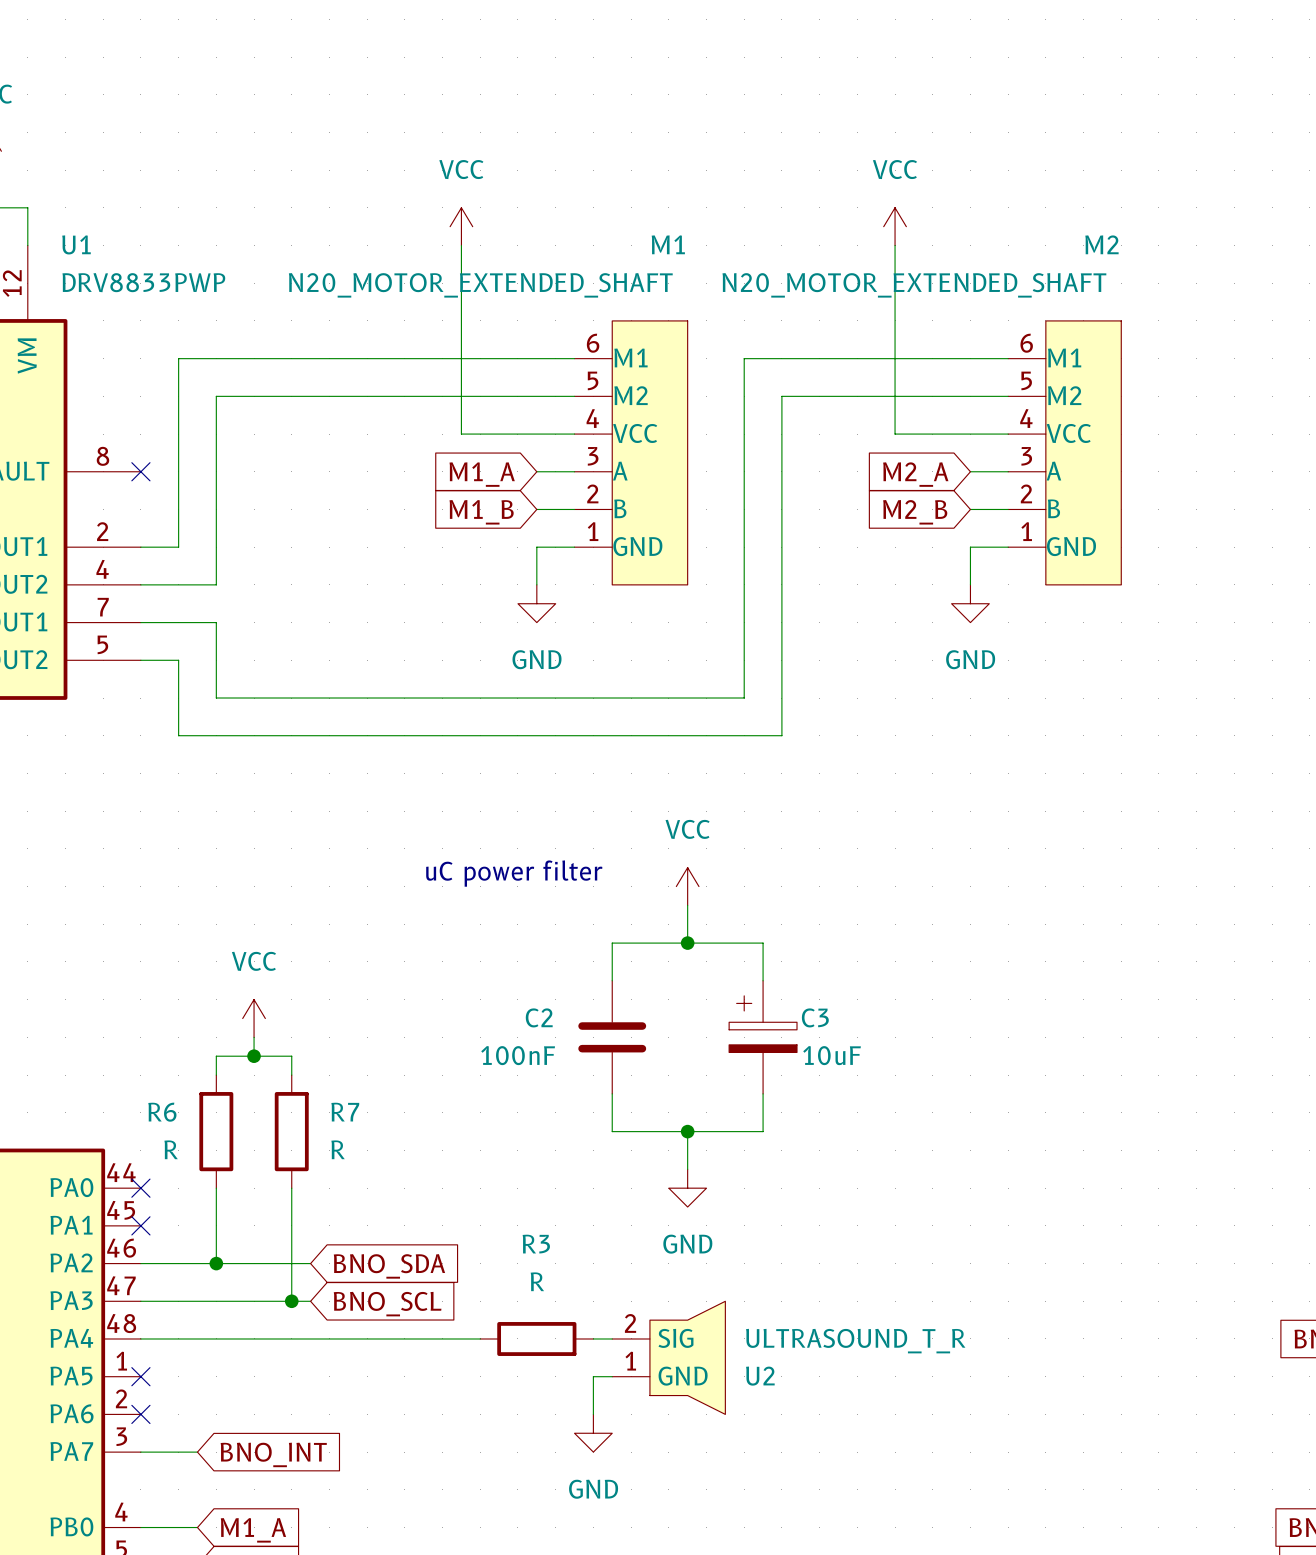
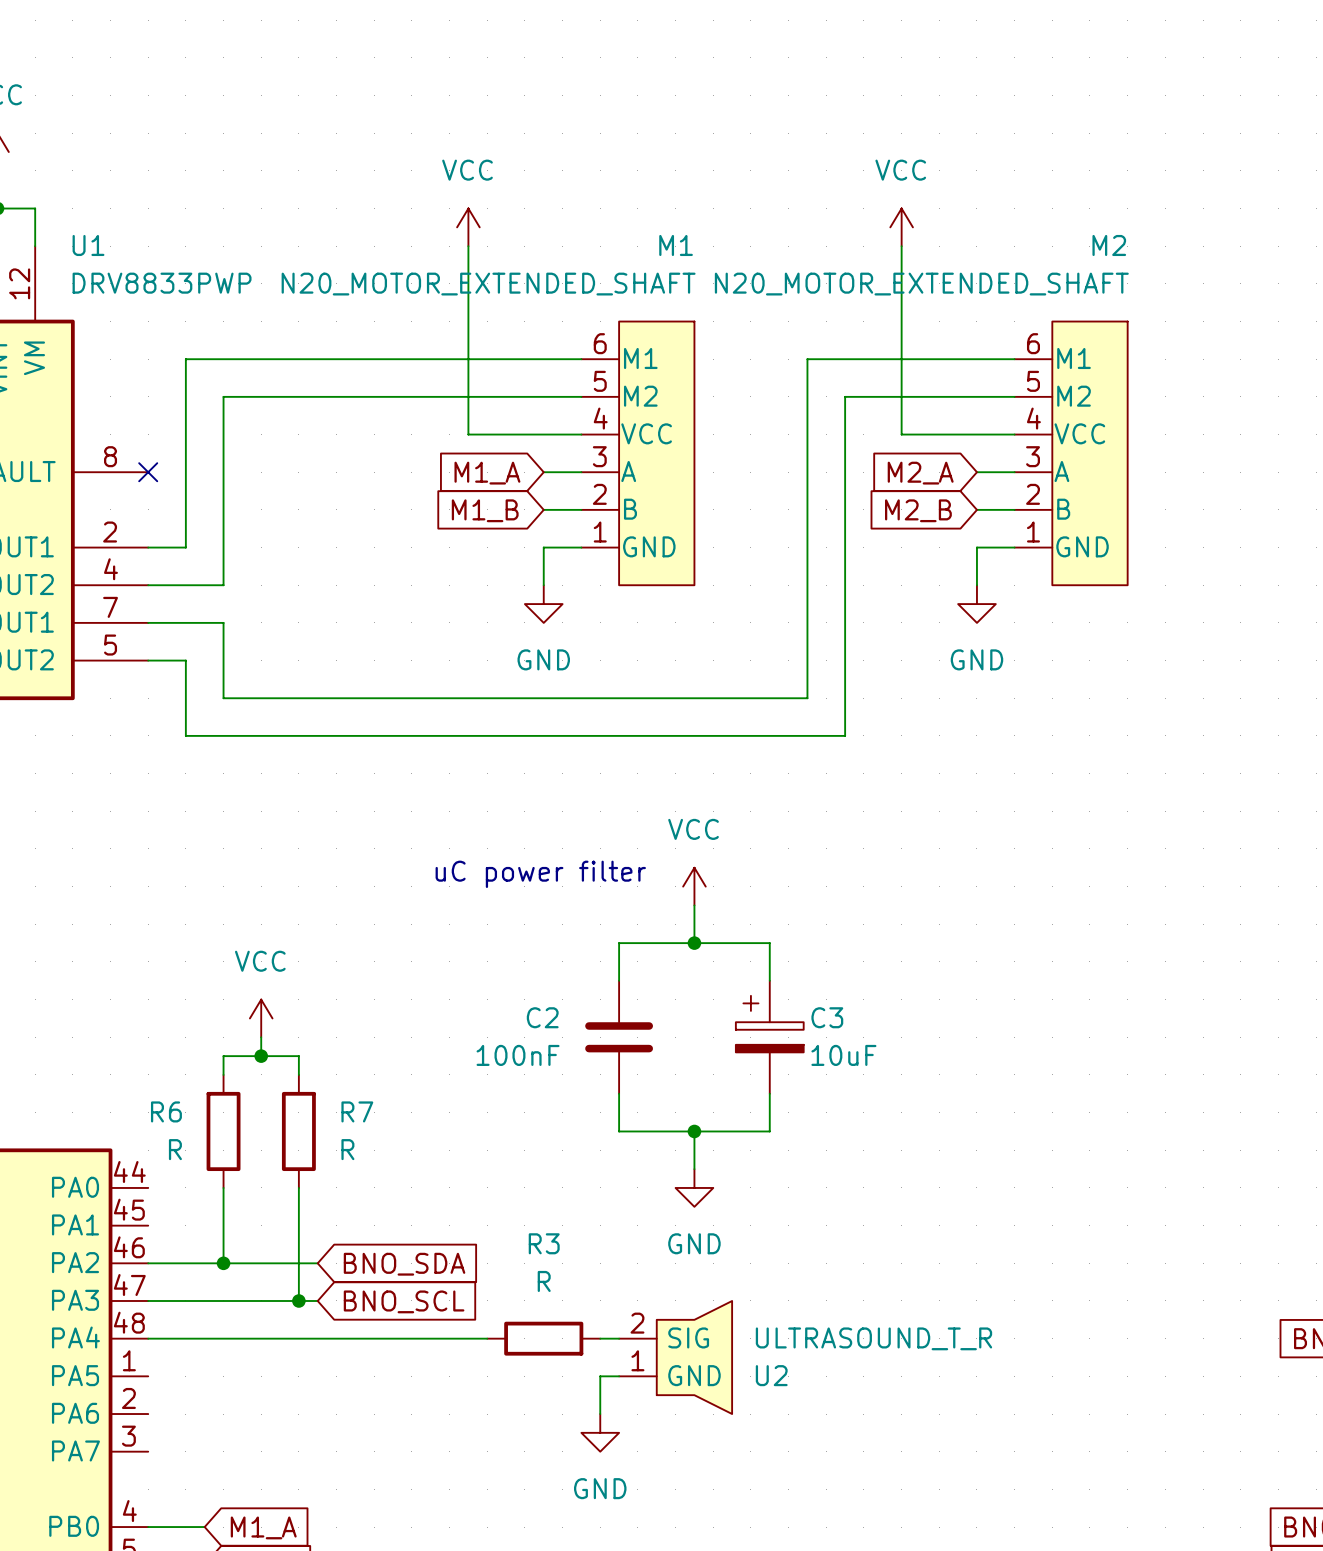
wire: (800, 358) (744, 358) (744, 698) -> (807, 359) (807, 698) (750, 698)
wire: (838, 396) (781, 396) (781, 735) -> (845, 396) (845, 735) (788, 735)
no-connect mark: (140, 1188) -> none
no-connect mark: (140, 1225) -> none
no-connect mark: (140, 1376) -> none
no-connect mark: (140, 1414) -> none
wire: (140, 1452) (197, 1452) -> none
global label: BNO_INT (273, 1454) -> none

